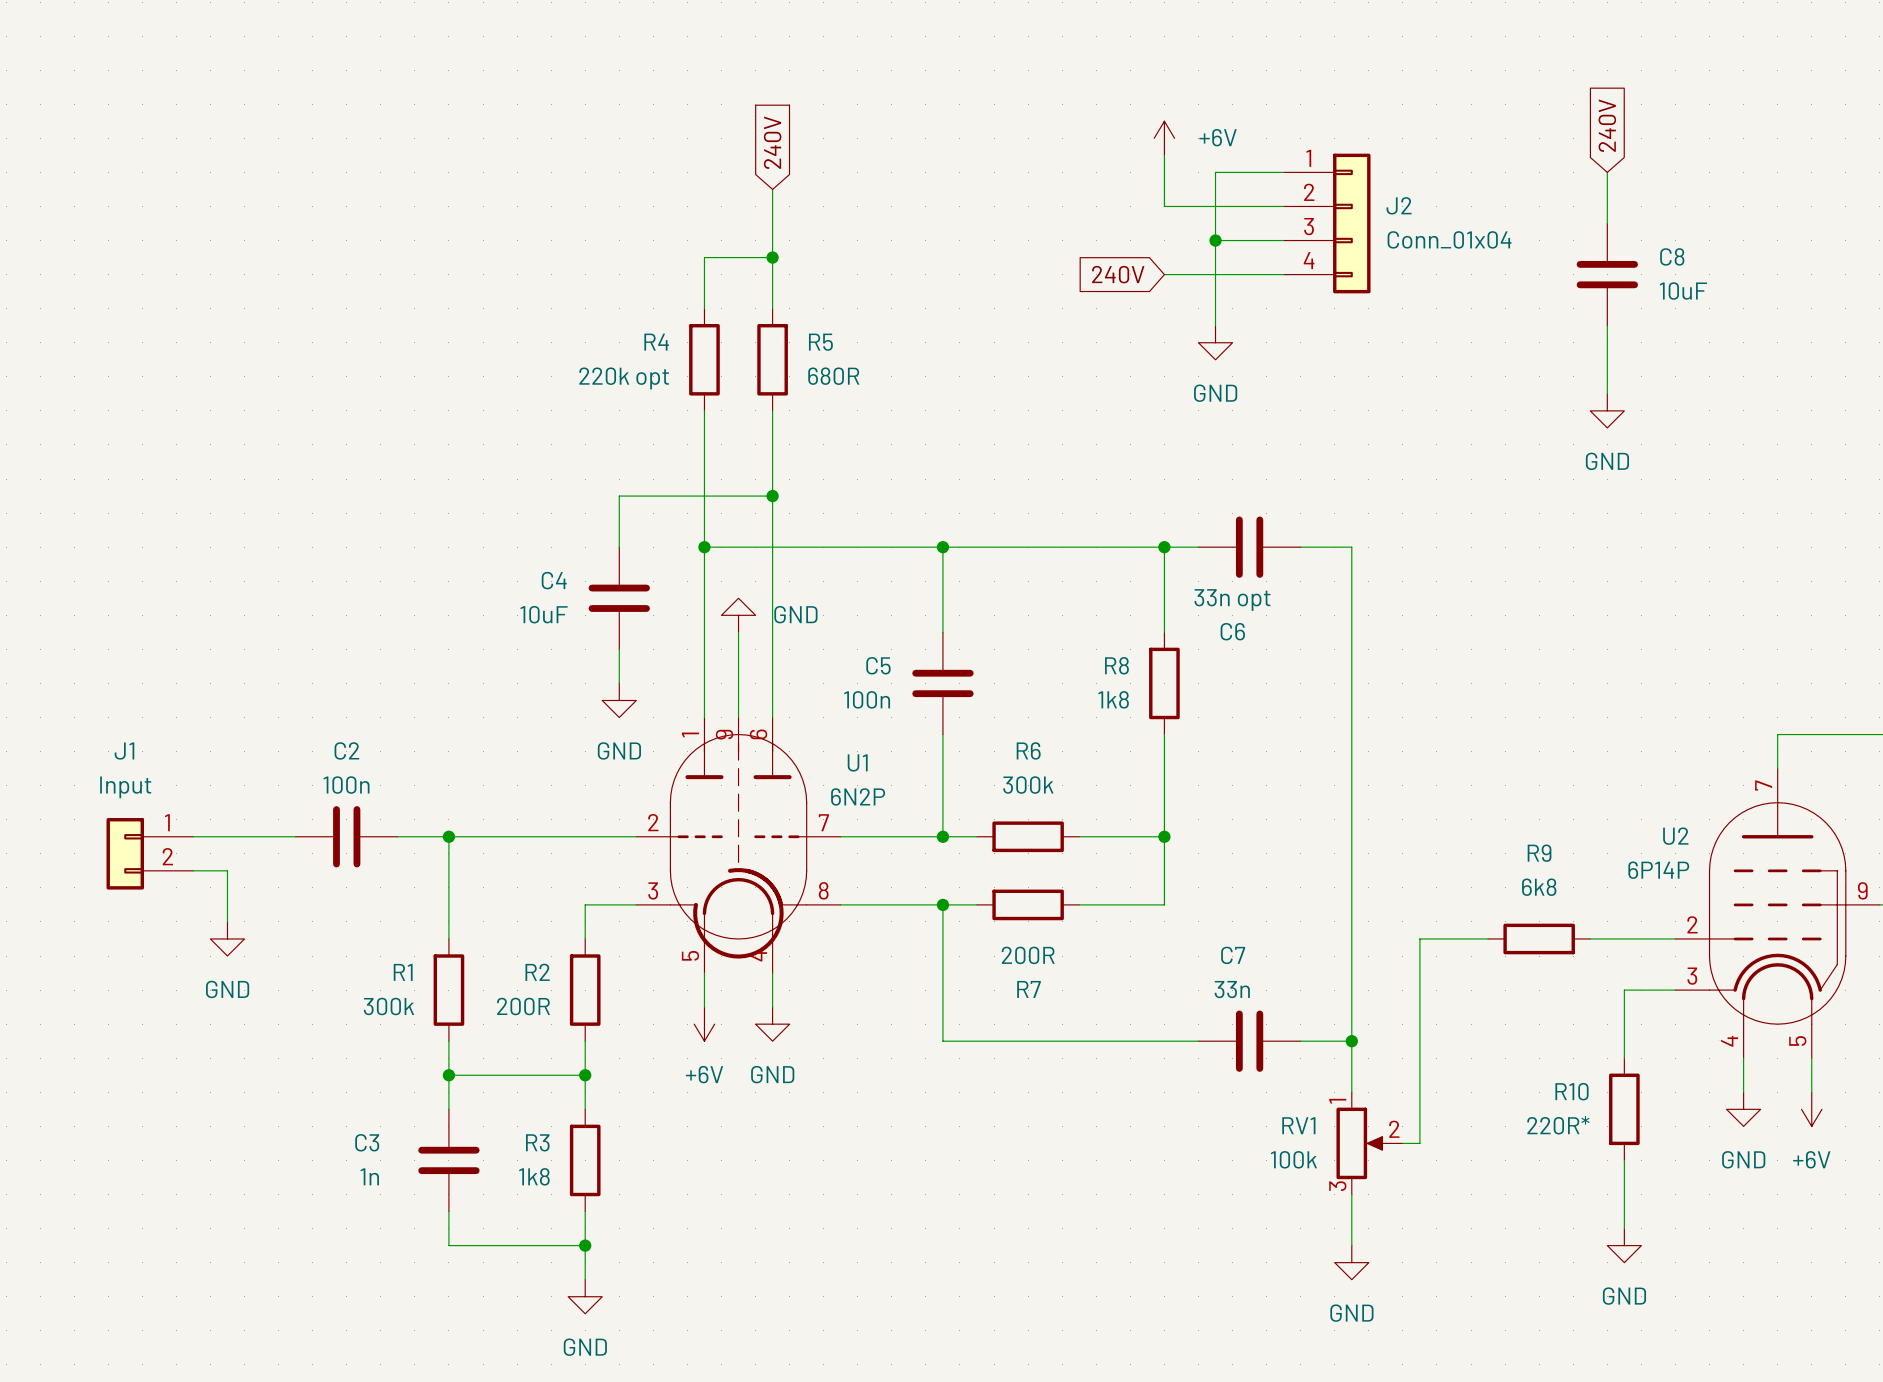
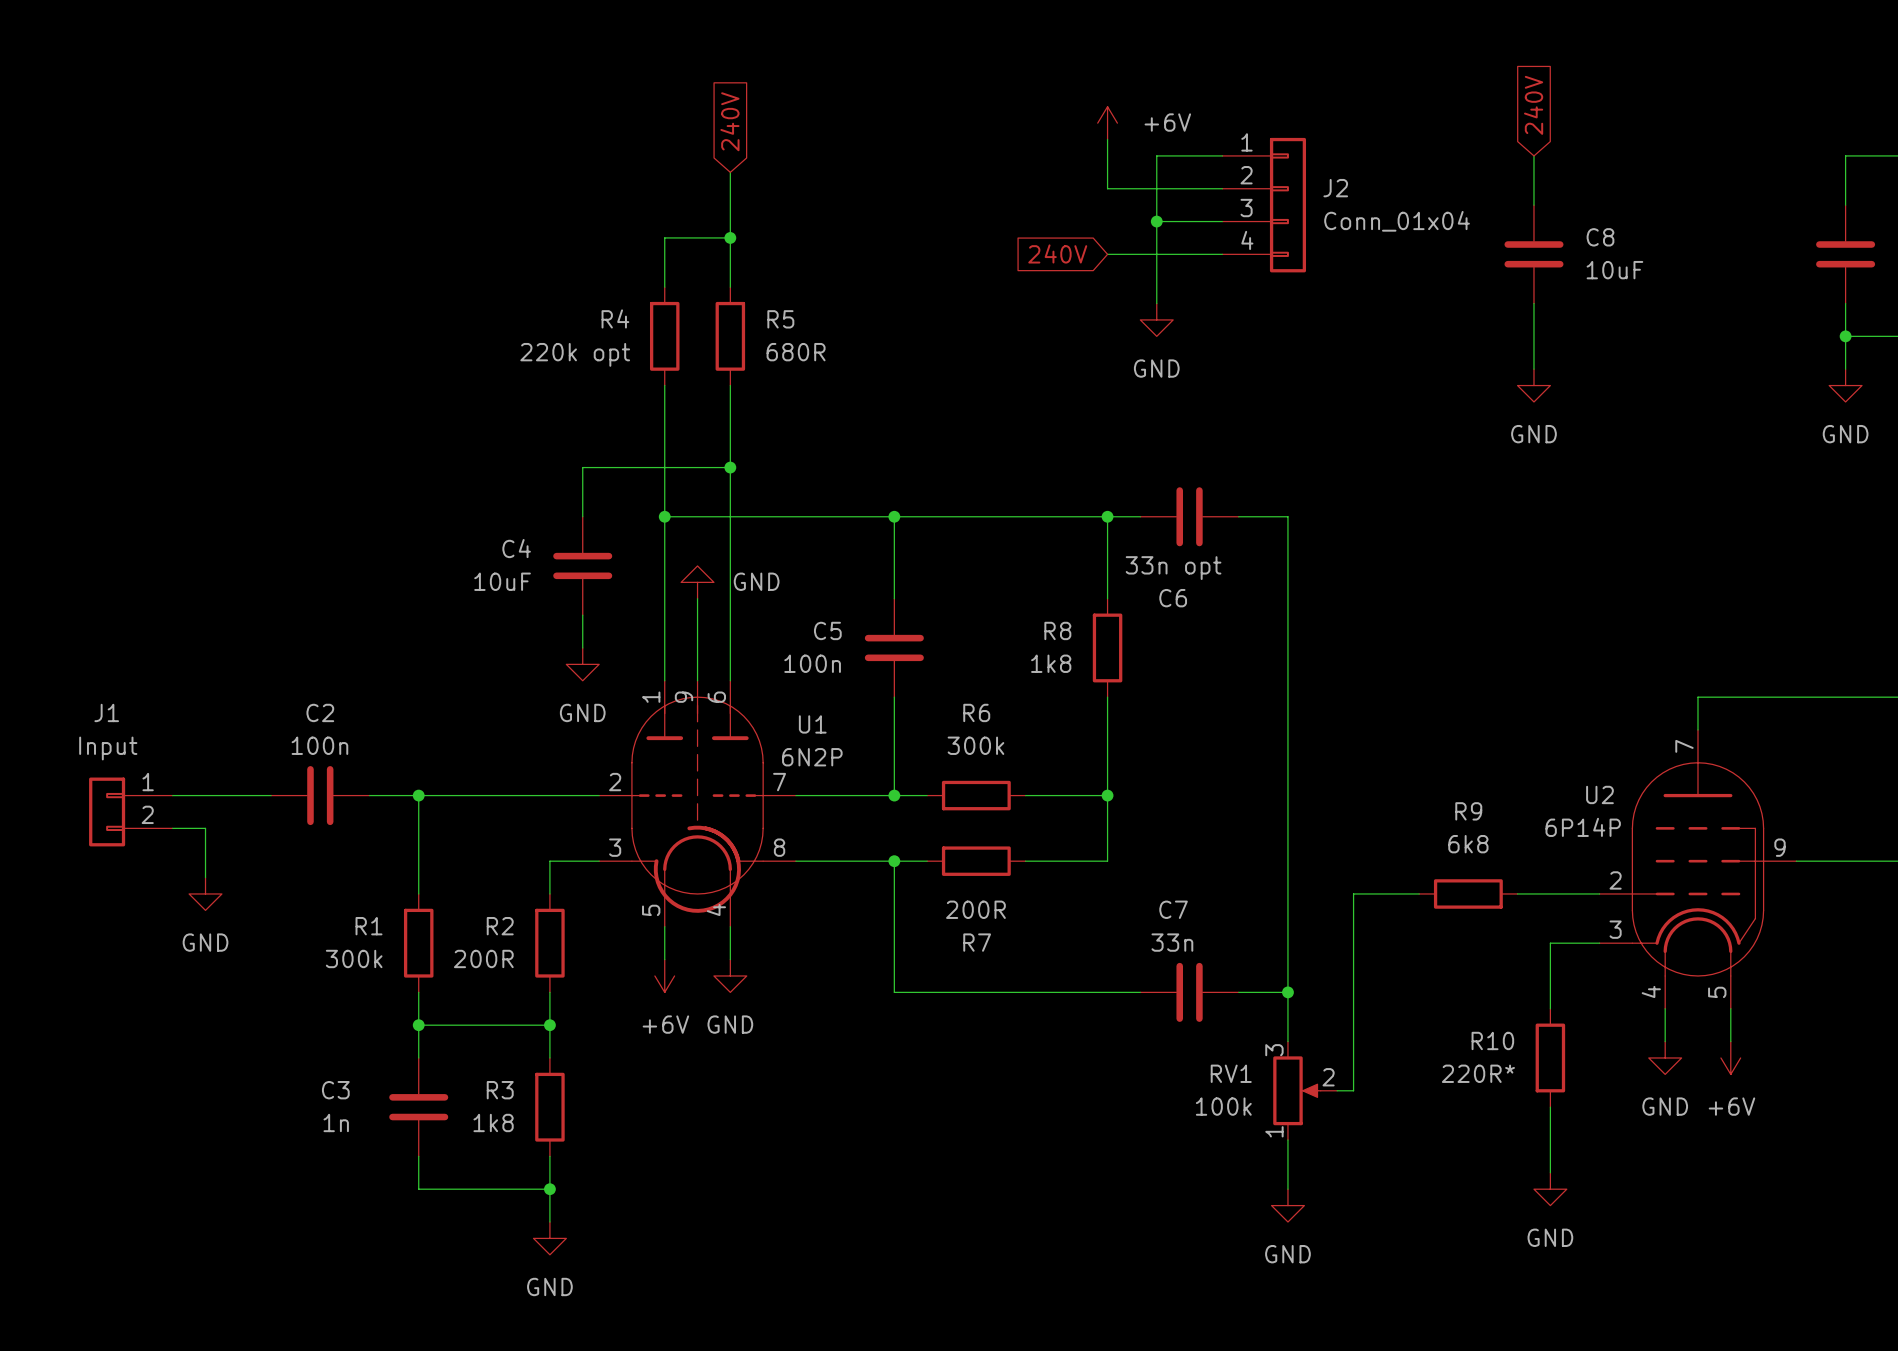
RV1 flip: as is (1361, 1143) -> up-down (1296, 1090)

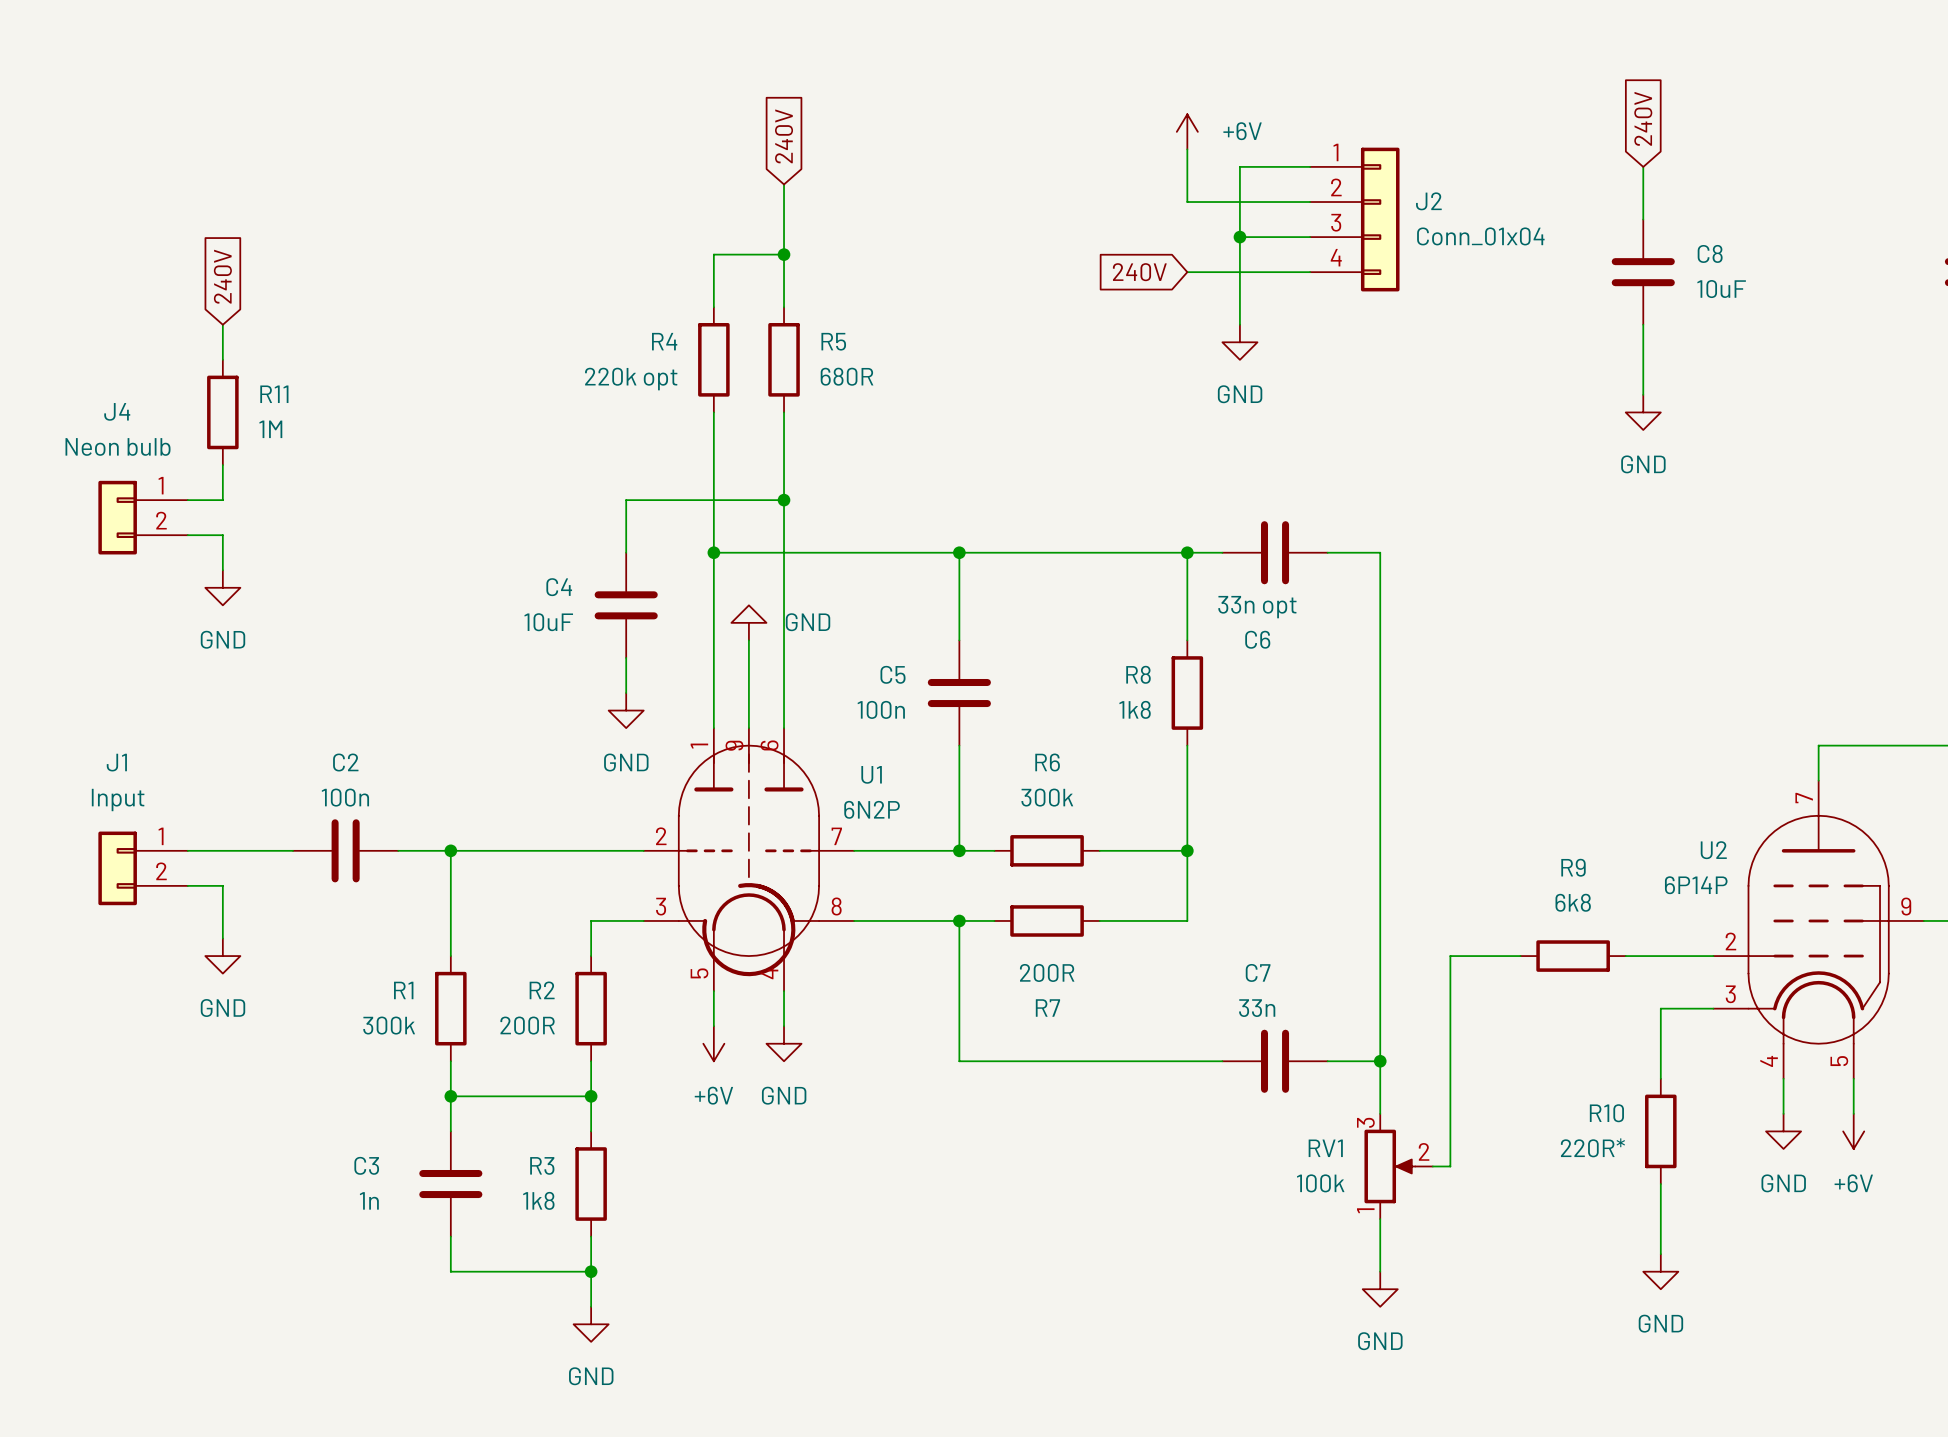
global label: none -> 240V (222, 276)
wire: none -> (222, 324) (222, 359)
R11: none -> 1M (222, 412)
wire: none -> (222, 465) (222, 500) (187, 500)
J4: none -> Neon bulb (143, 517)
wire: none -> (187, 535) (222, 535) (222, 570)
power symbol: none -> GND (222, 587)

